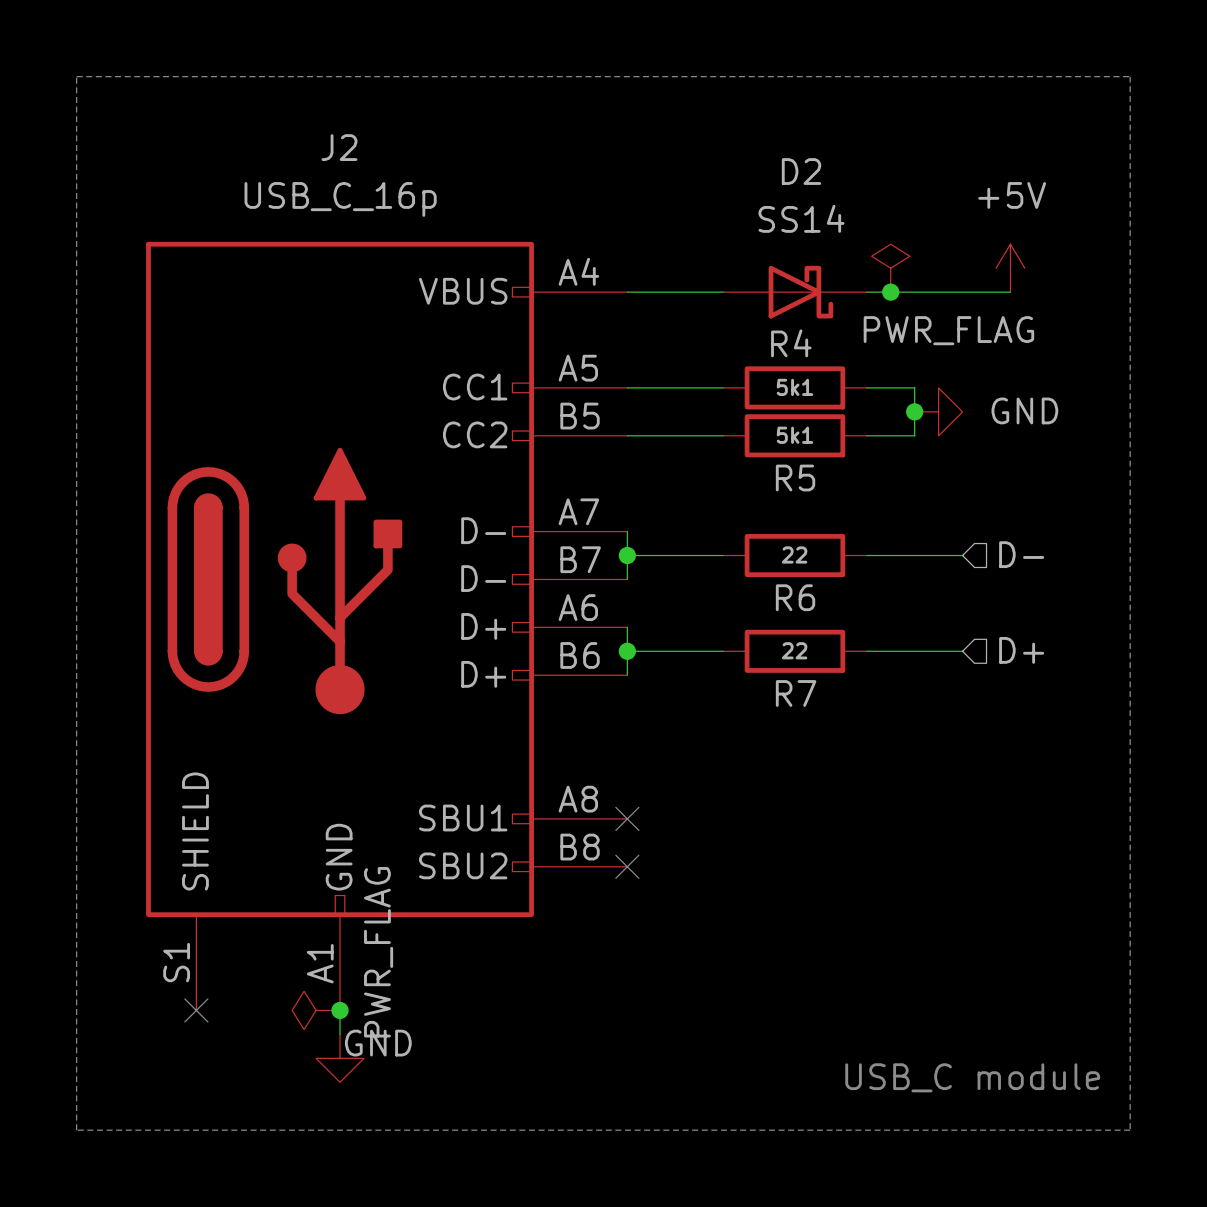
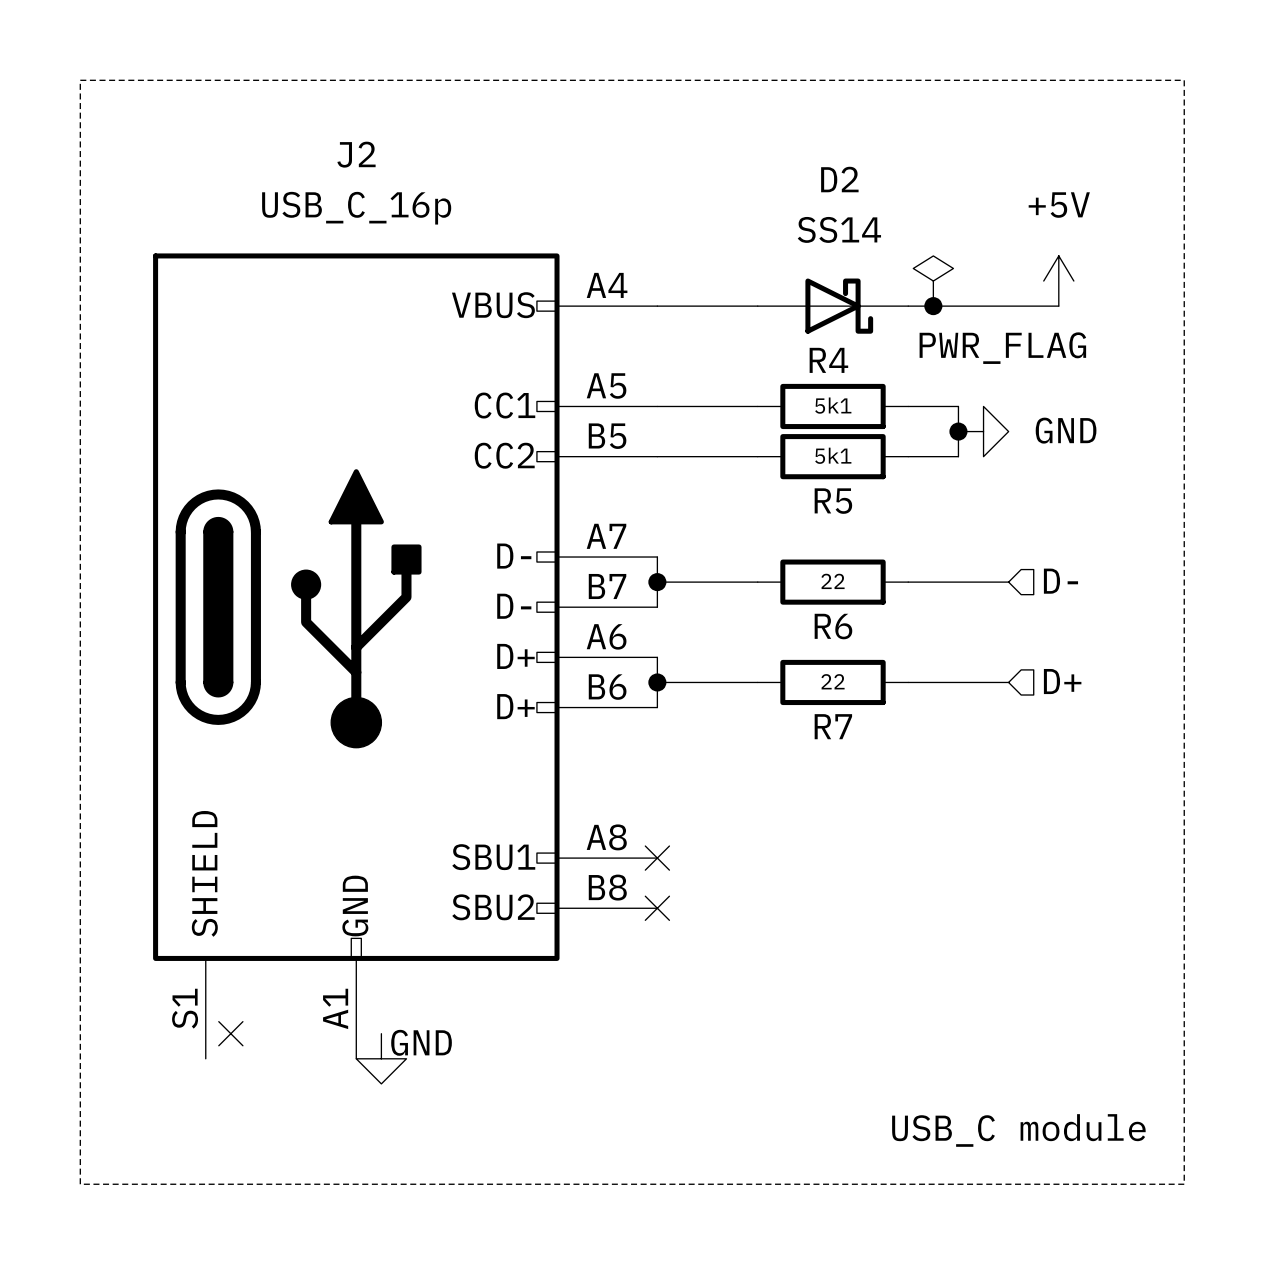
no-connect mark position: (196, 1010) -> (230, 1033)
power symbol: PWR_FLAG (316, 1010) -> none
wire: (340, 1010) (340, 1034) -> none
junction: (340, 1010) -> none
power symbol position: GND (340, 1058) -> GND (381, 1058)

